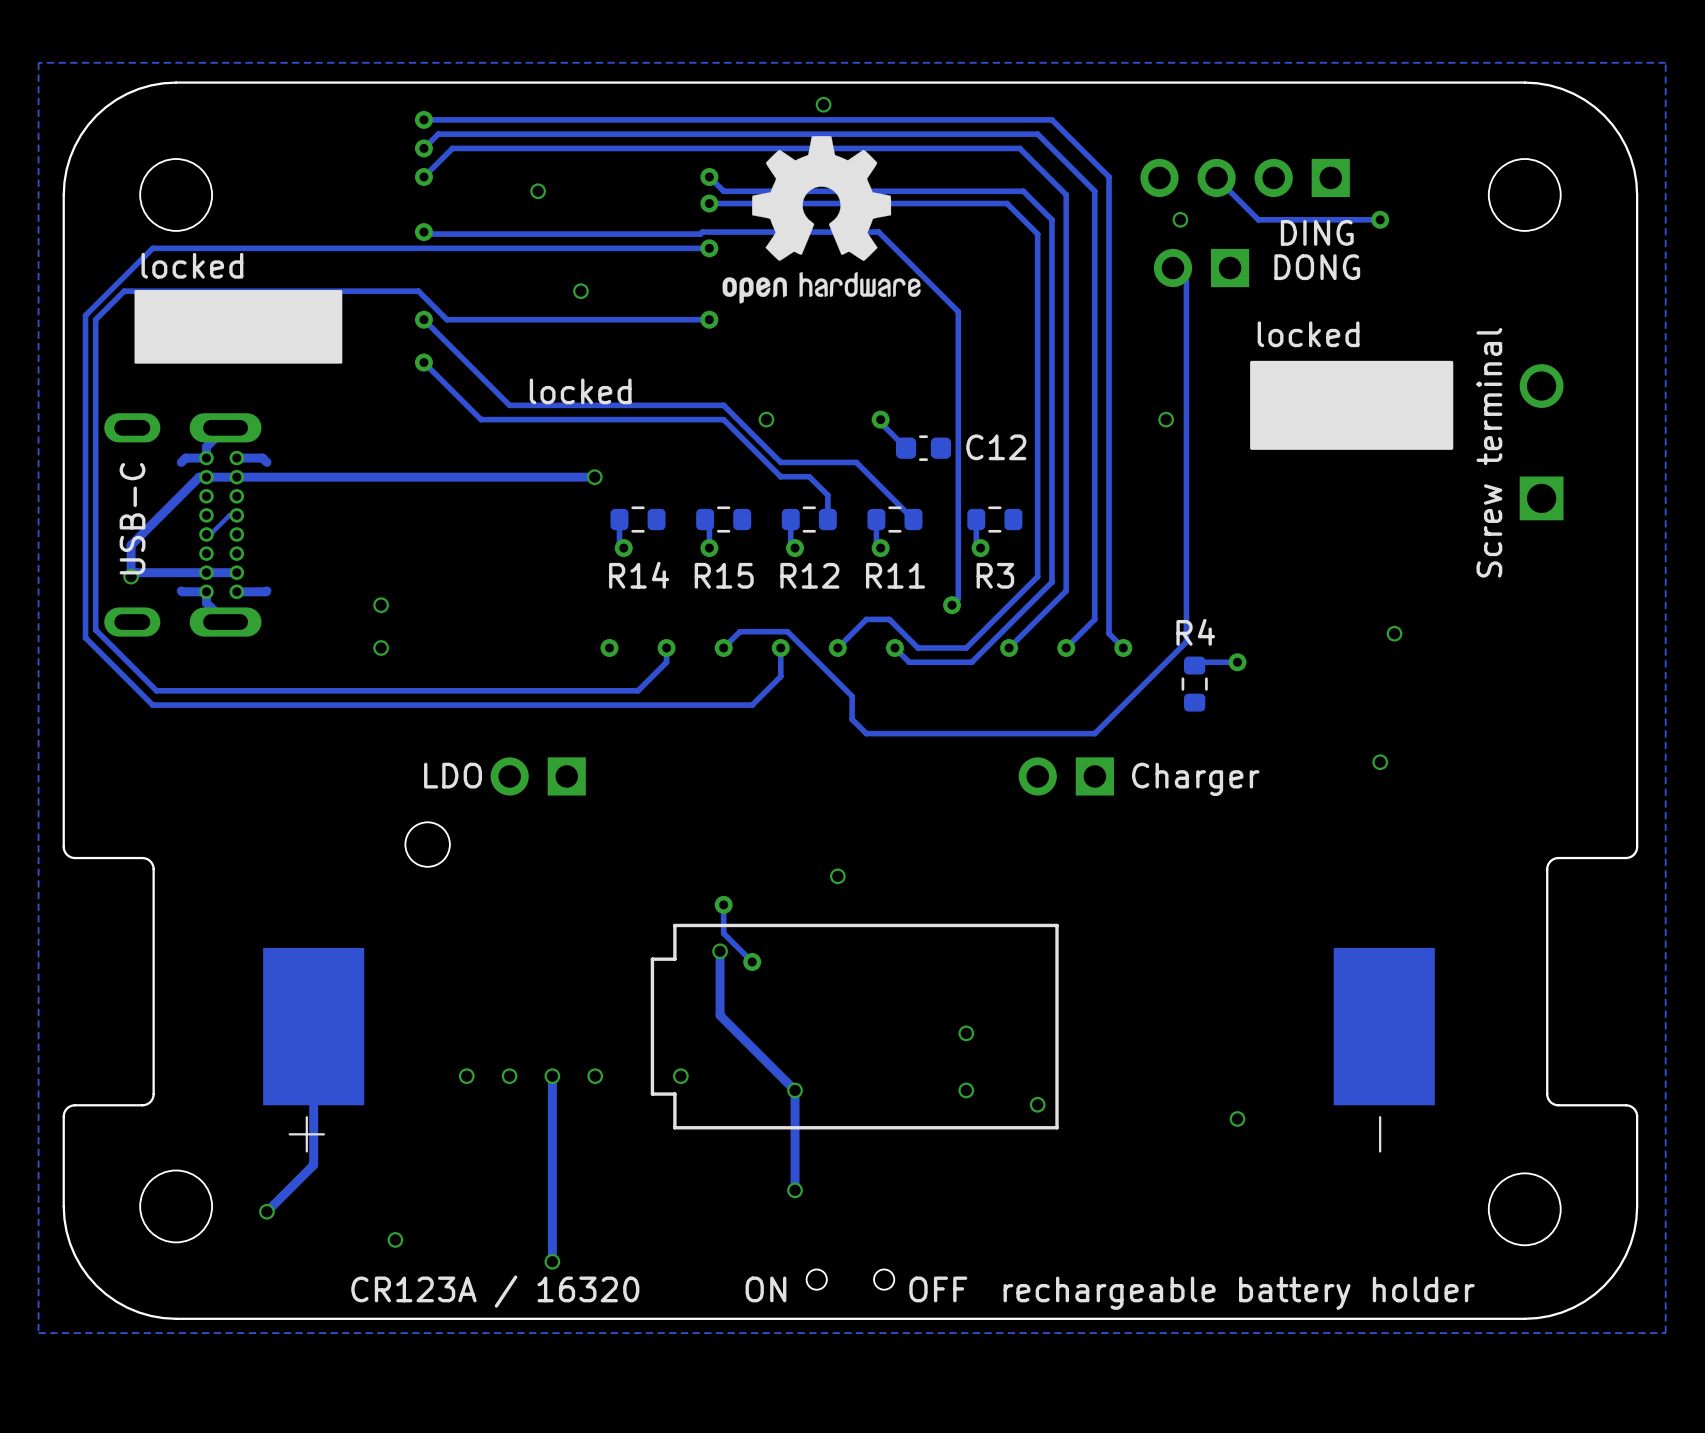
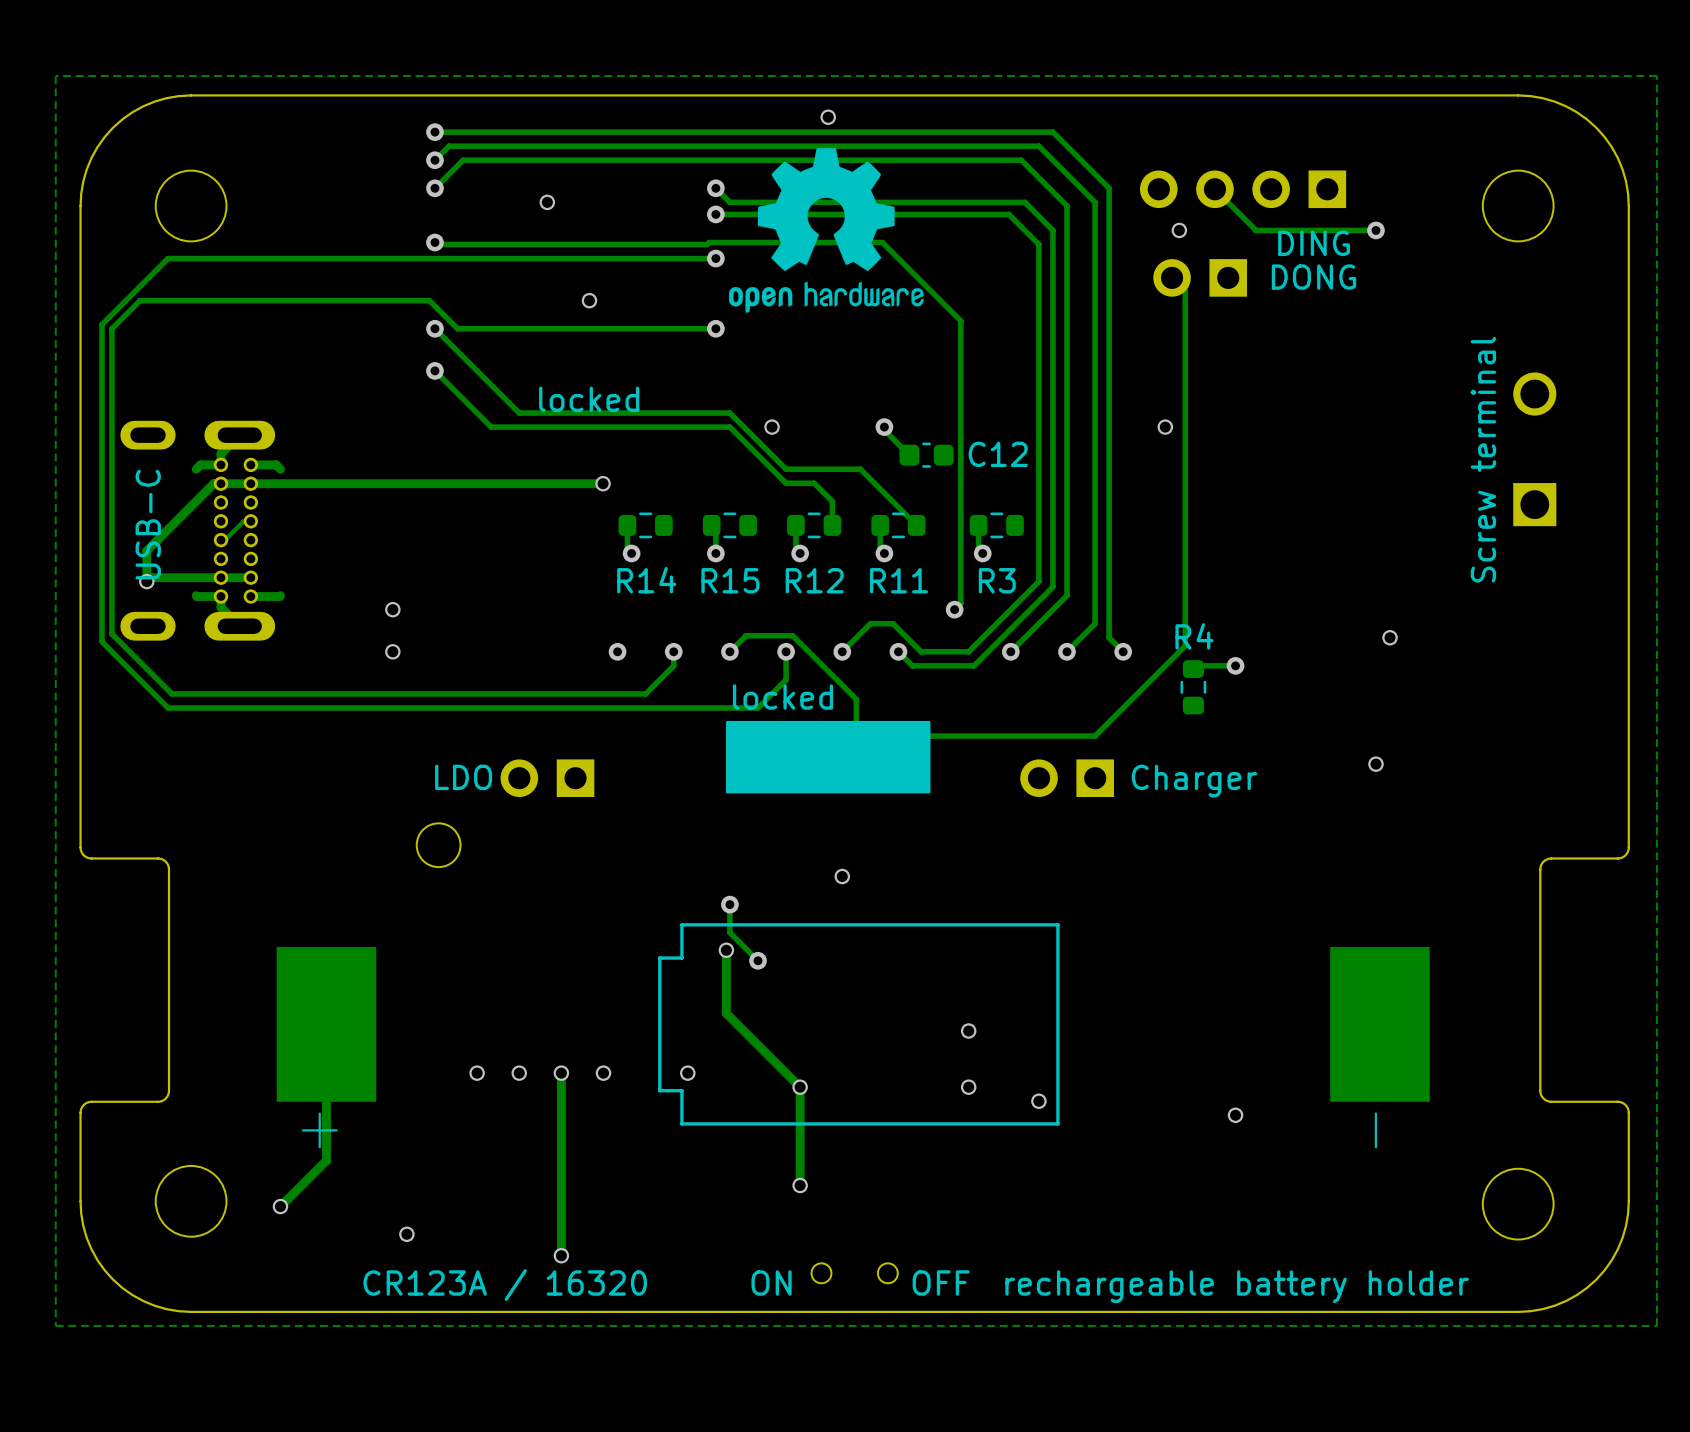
text: locked (192, 265) -> none
drawing: [134, 290, 343, 364] -> none
text: locked (1308, 334) -> none
drawing: [1250, 360, 1454, 450] -> none
text: none -> locked (783, 697)
drawing: none -> [726, 720, 931, 794]

